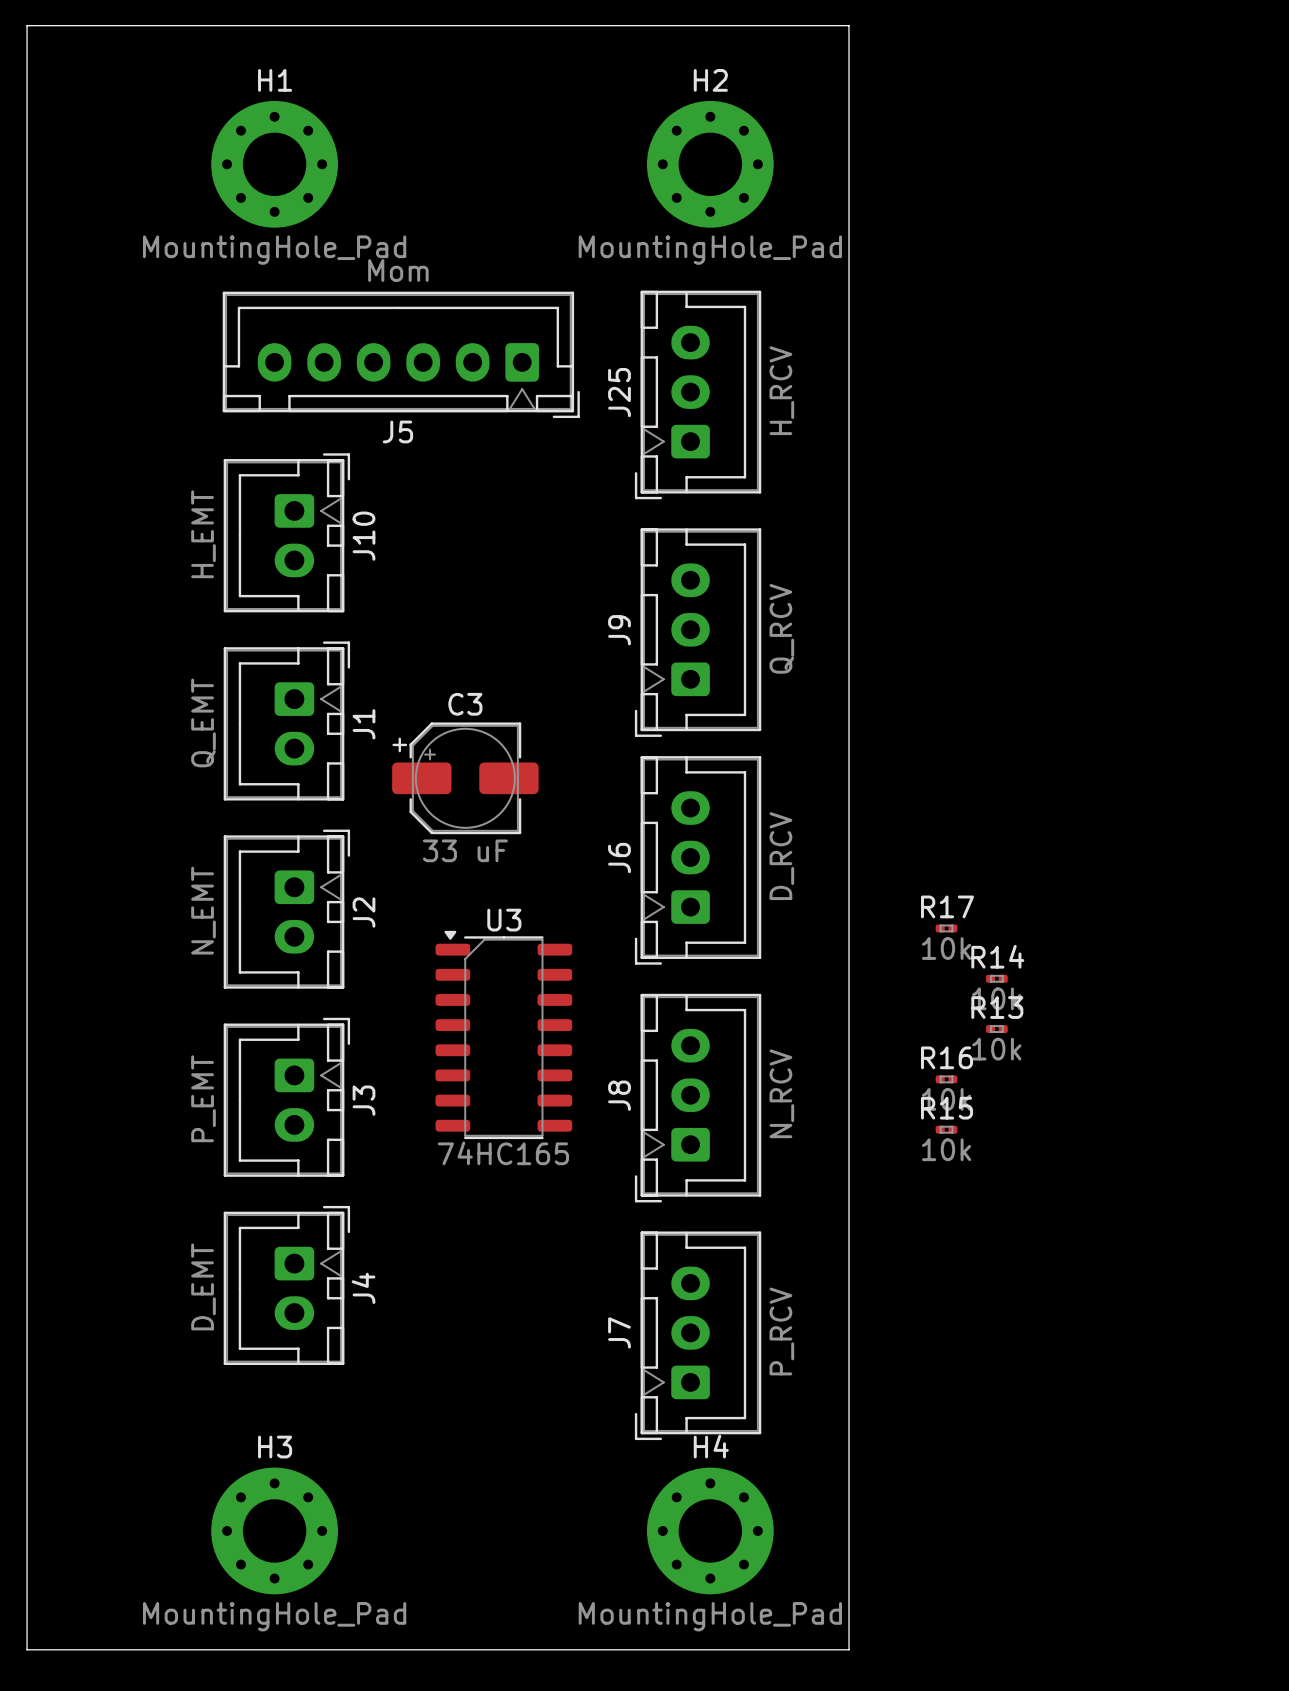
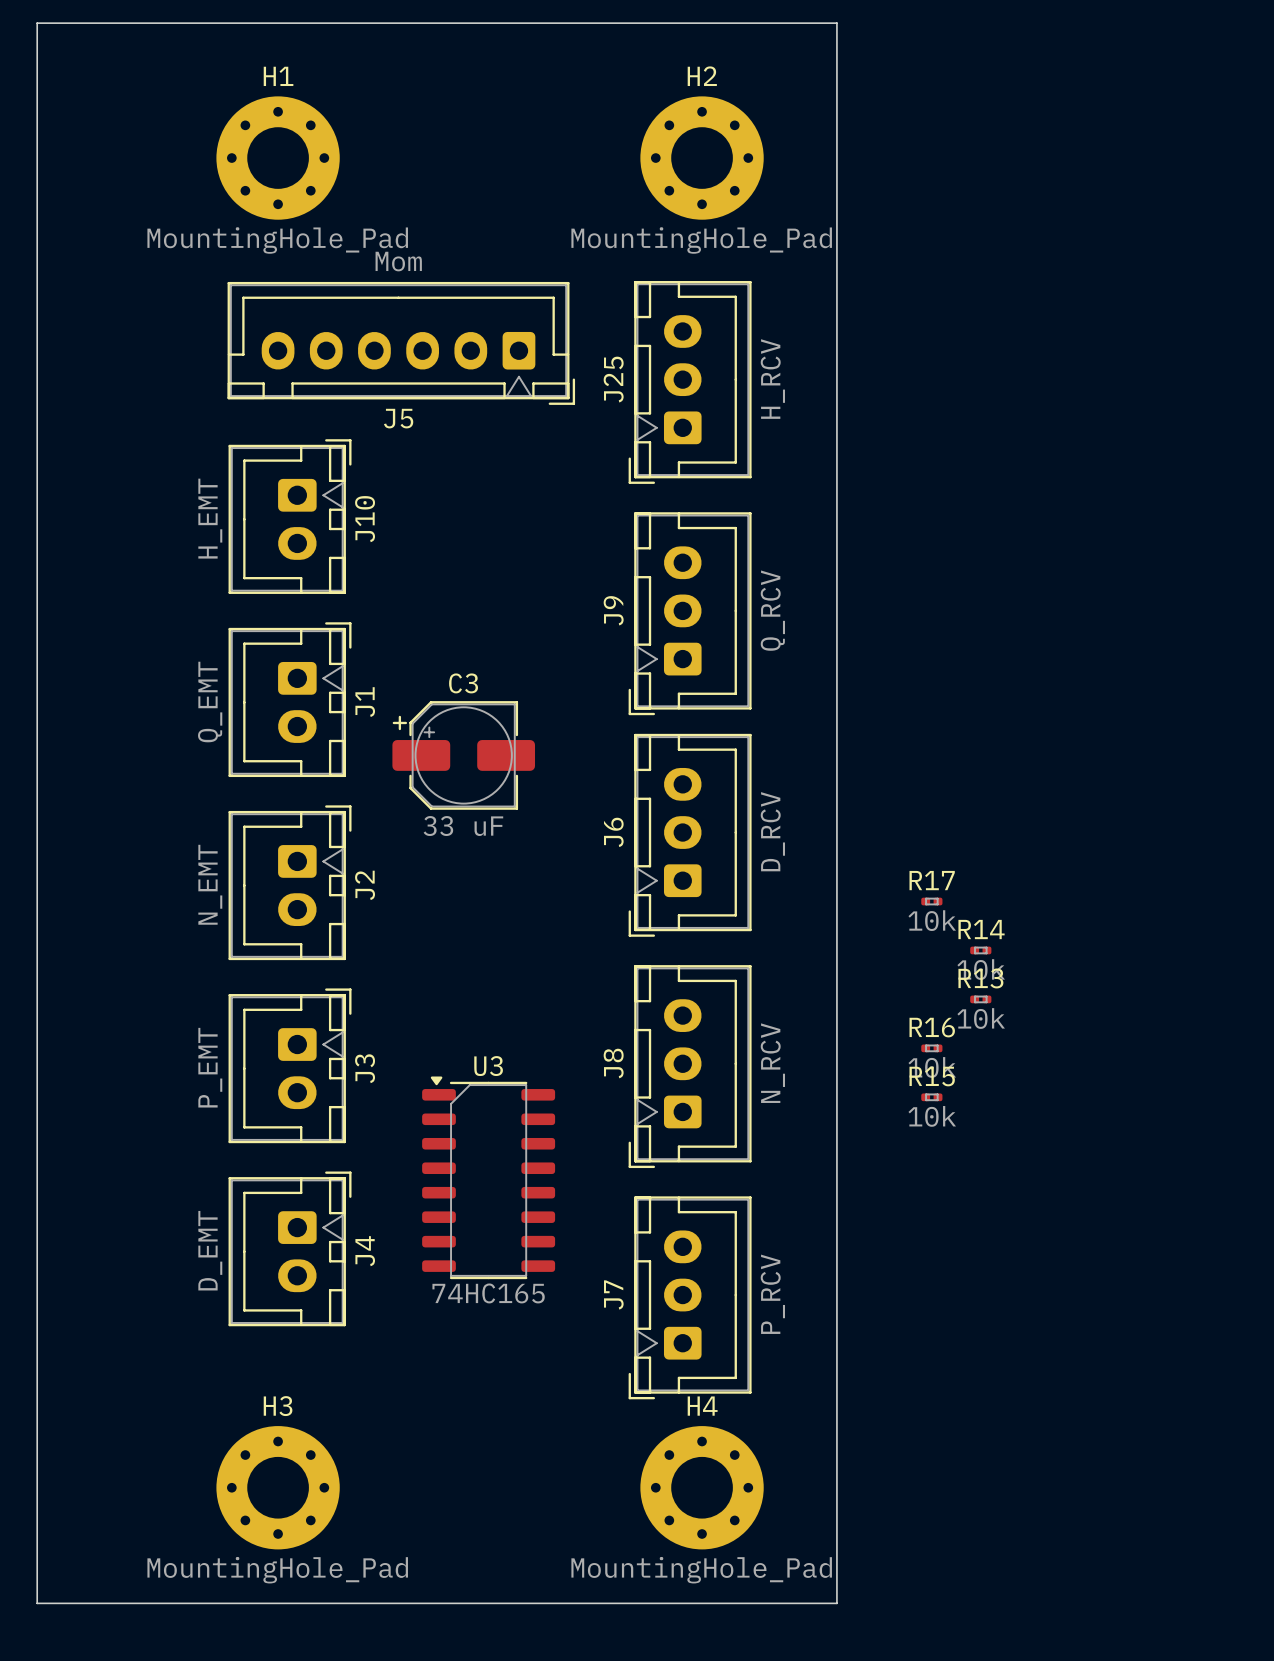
U3 position: (503, 1034) -> (488, 1177)

